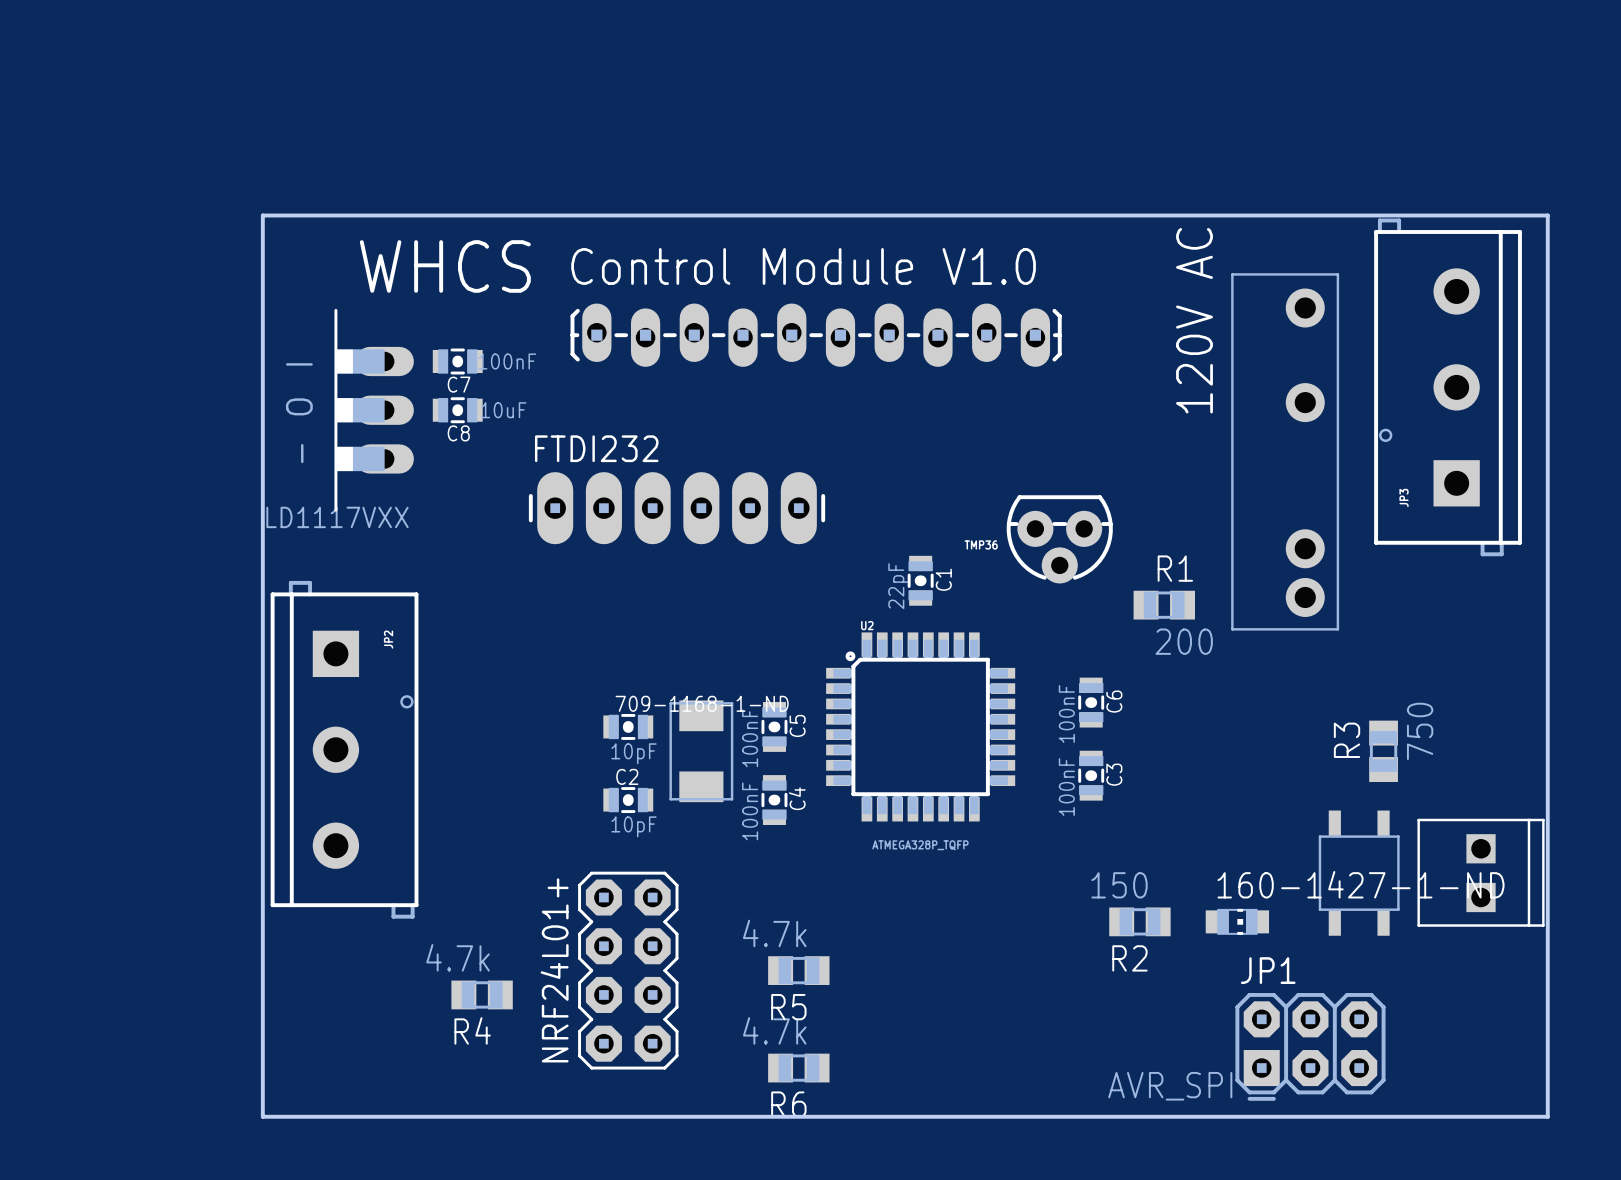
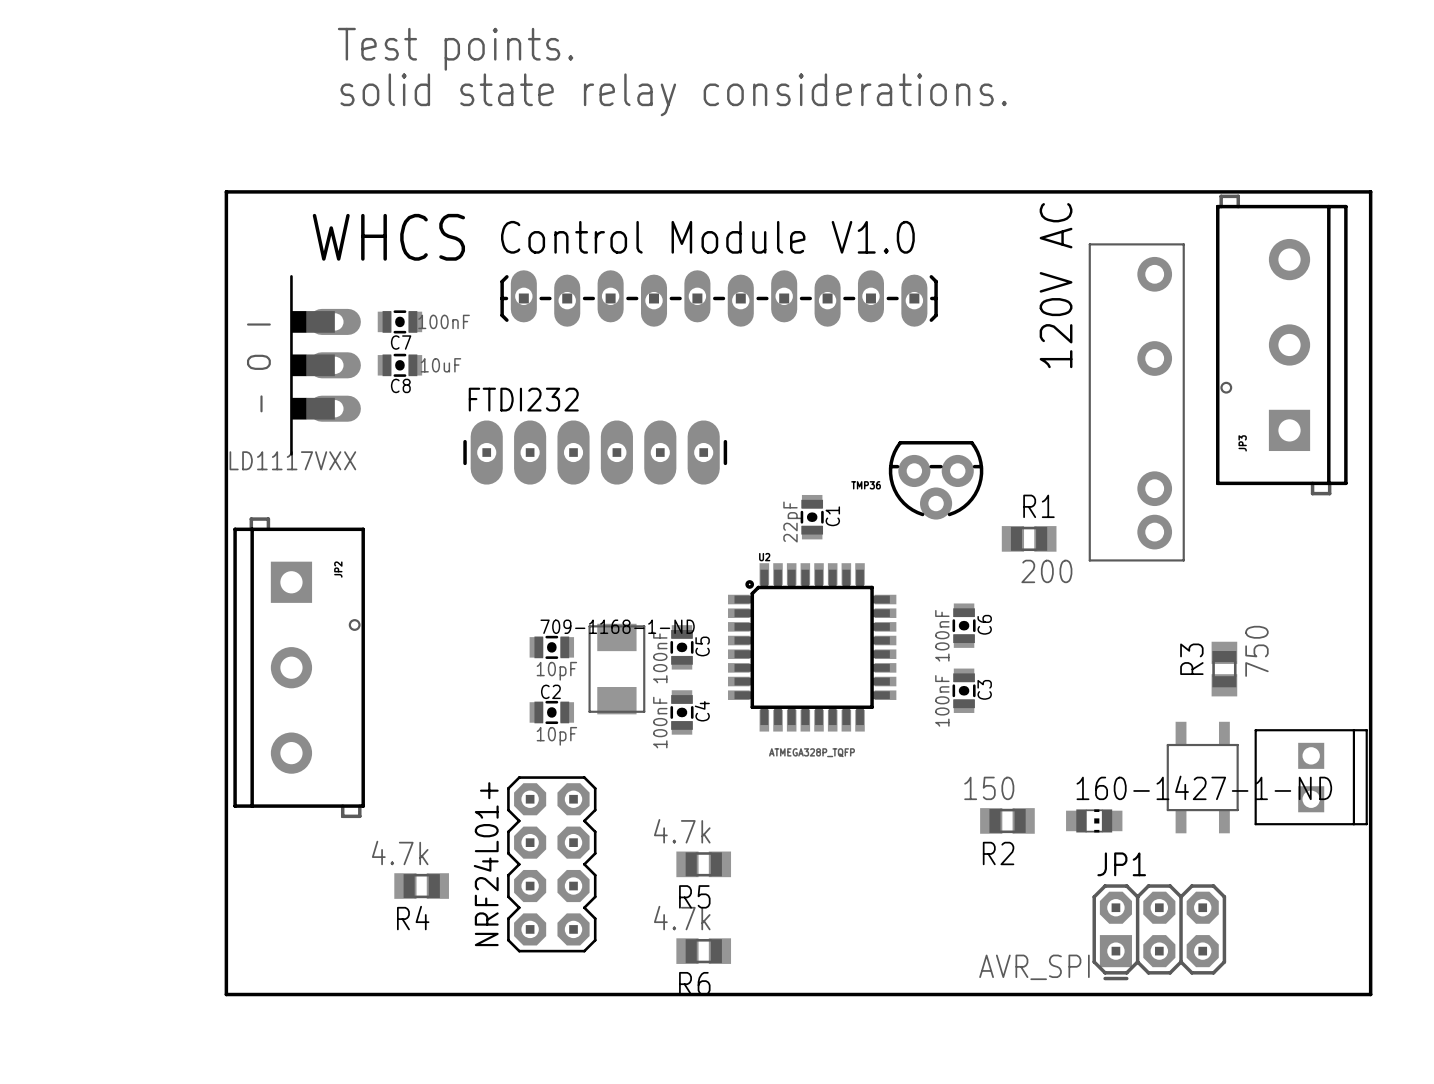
text: none -> Test points. (455, 49)
text: none -> solid state relay considerations. (673, 94)

